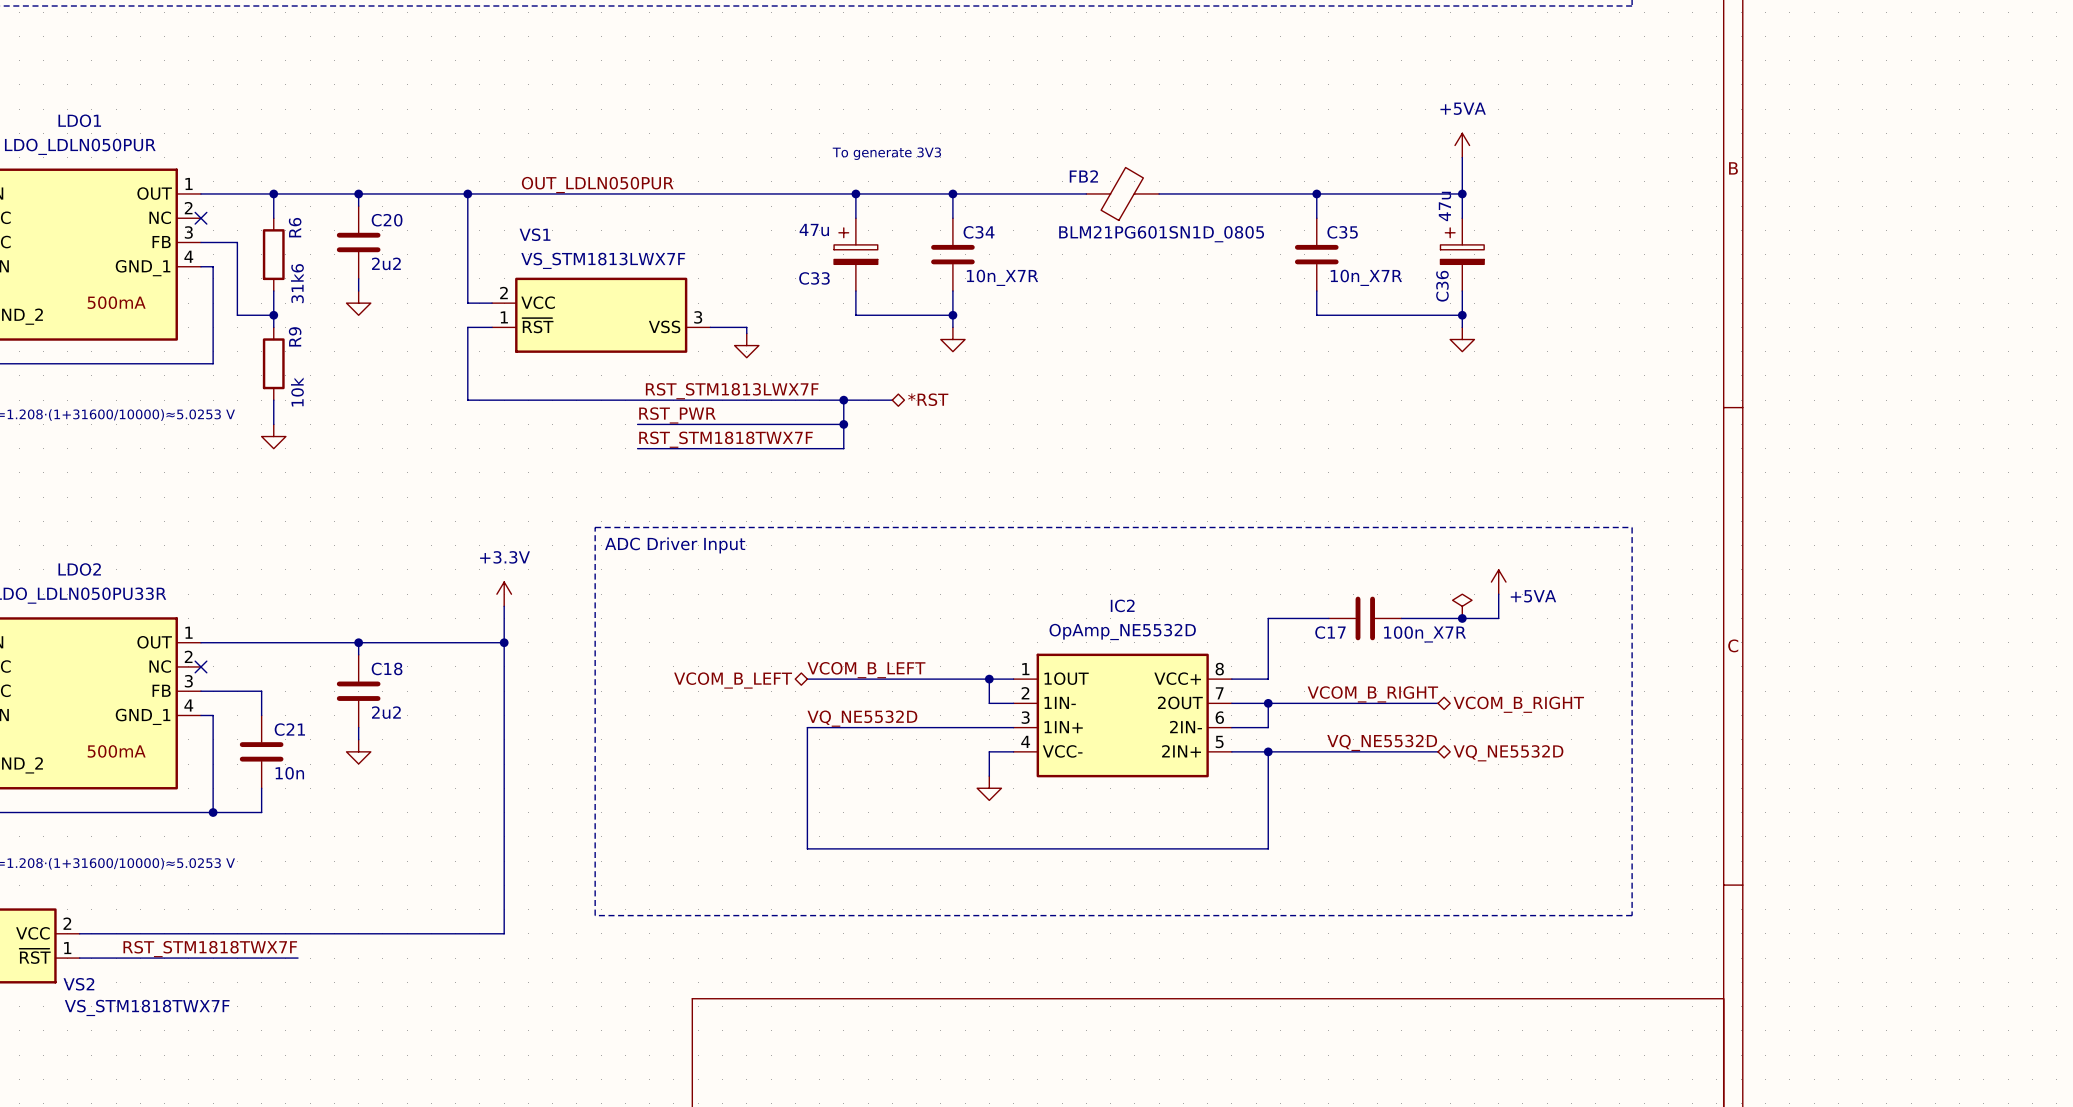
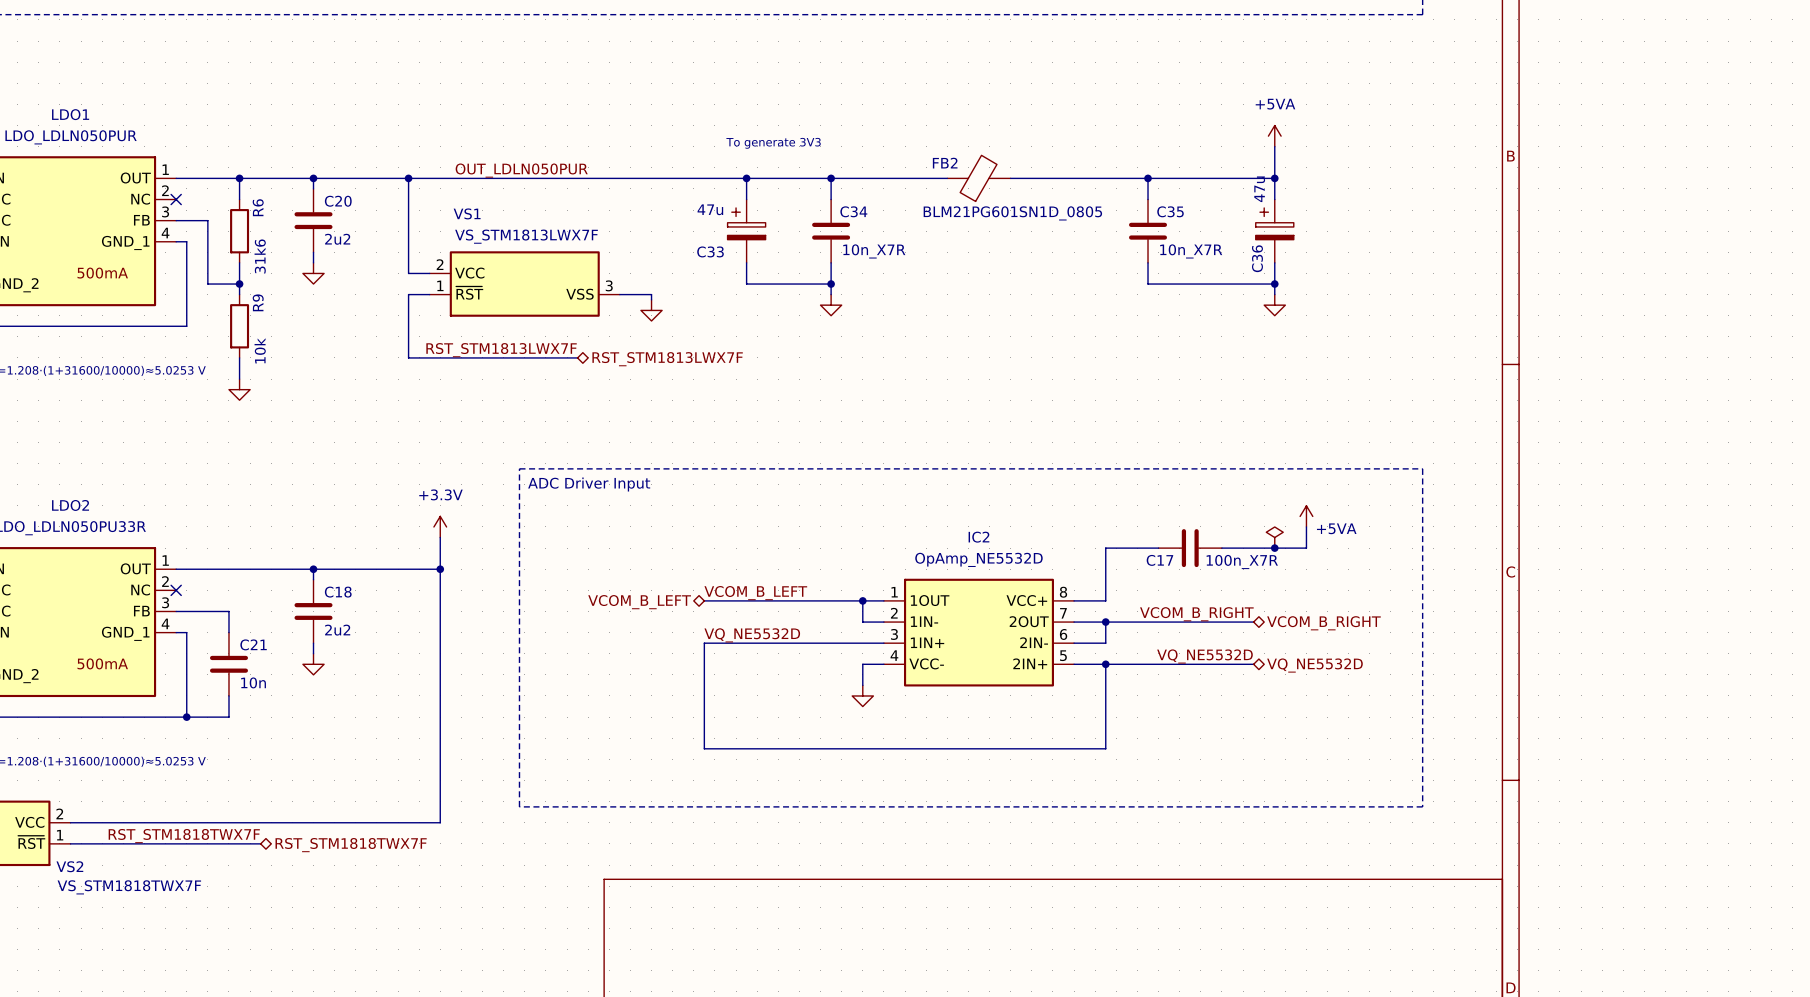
label position: RST_STM1813LWX7F (732, 391) -> RST_STM1813LWX7F (501, 350)
hierarchical label: *RST (928, 399) -> none
wire: (661, 400) (892, 400) -> none
wire: (843, 400) (843, 448) (637, 448) -> none
junction: (843, 400) -> none
hierarchical label: none -> RST_STM1813LWX7F (667, 359)
label: RST_PWR (677, 415) -> none
wire: (637, 424) (843, 424) -> none
junction: (843, 424) -> none
label: RST_STM1818TWX7F (726, 439) -> none
hierarchical label: none -> RST_STM1818TWX7F (351, 845)

